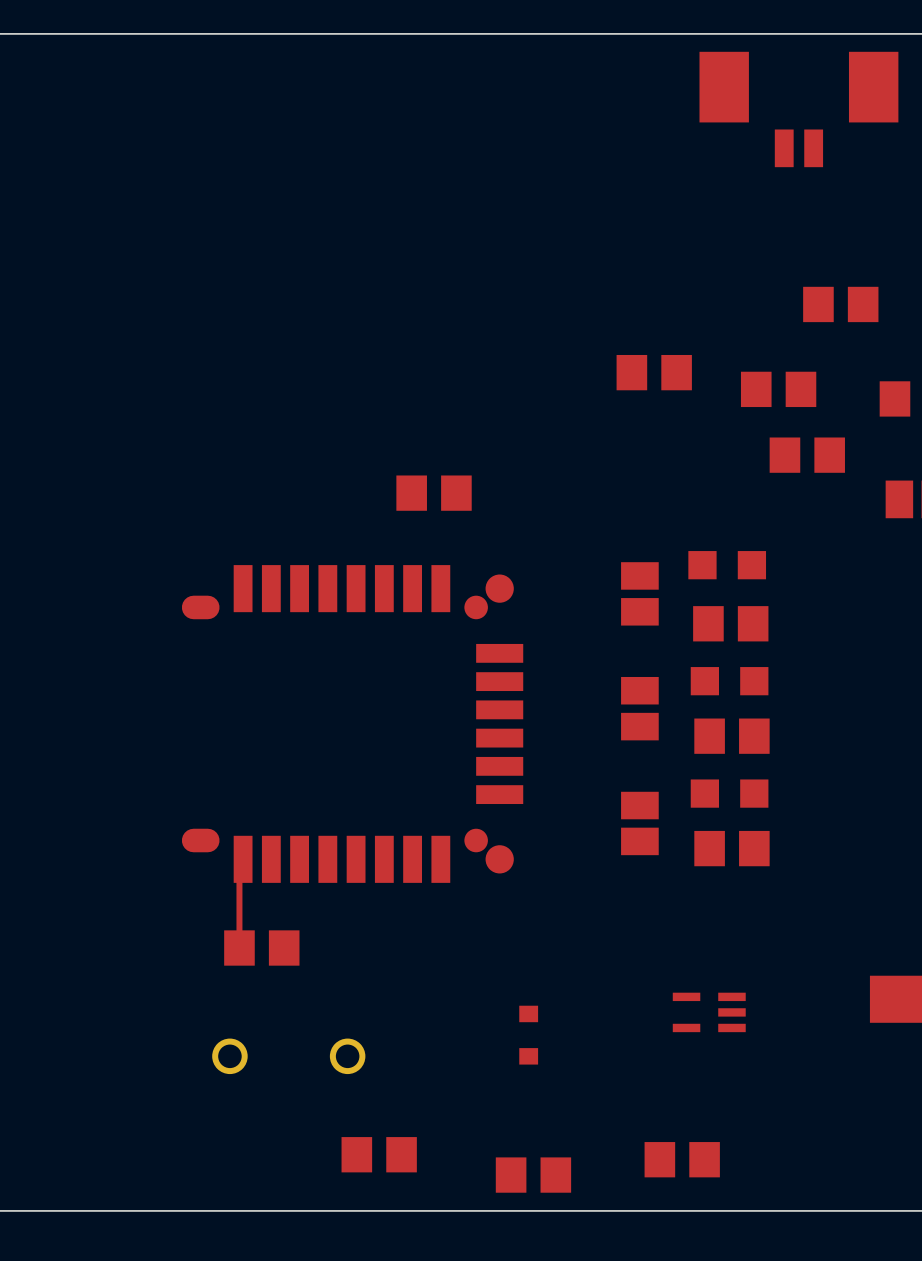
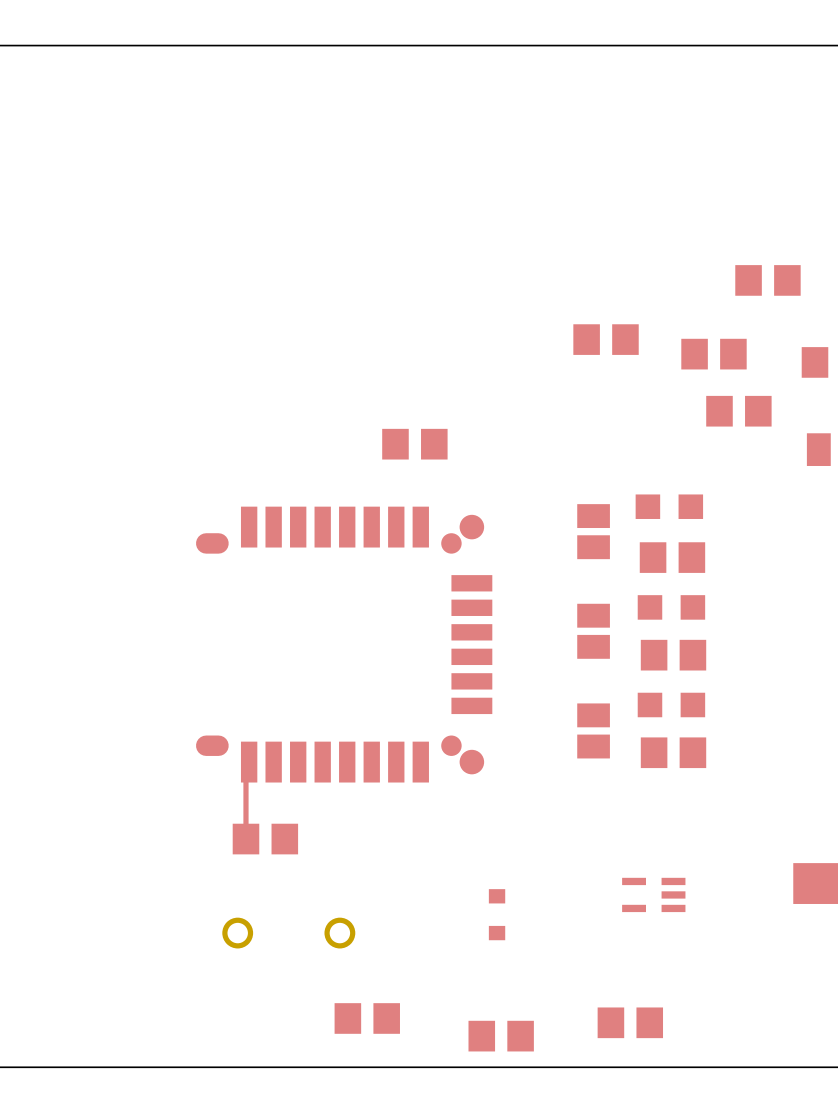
part: (798, 109) -> none

